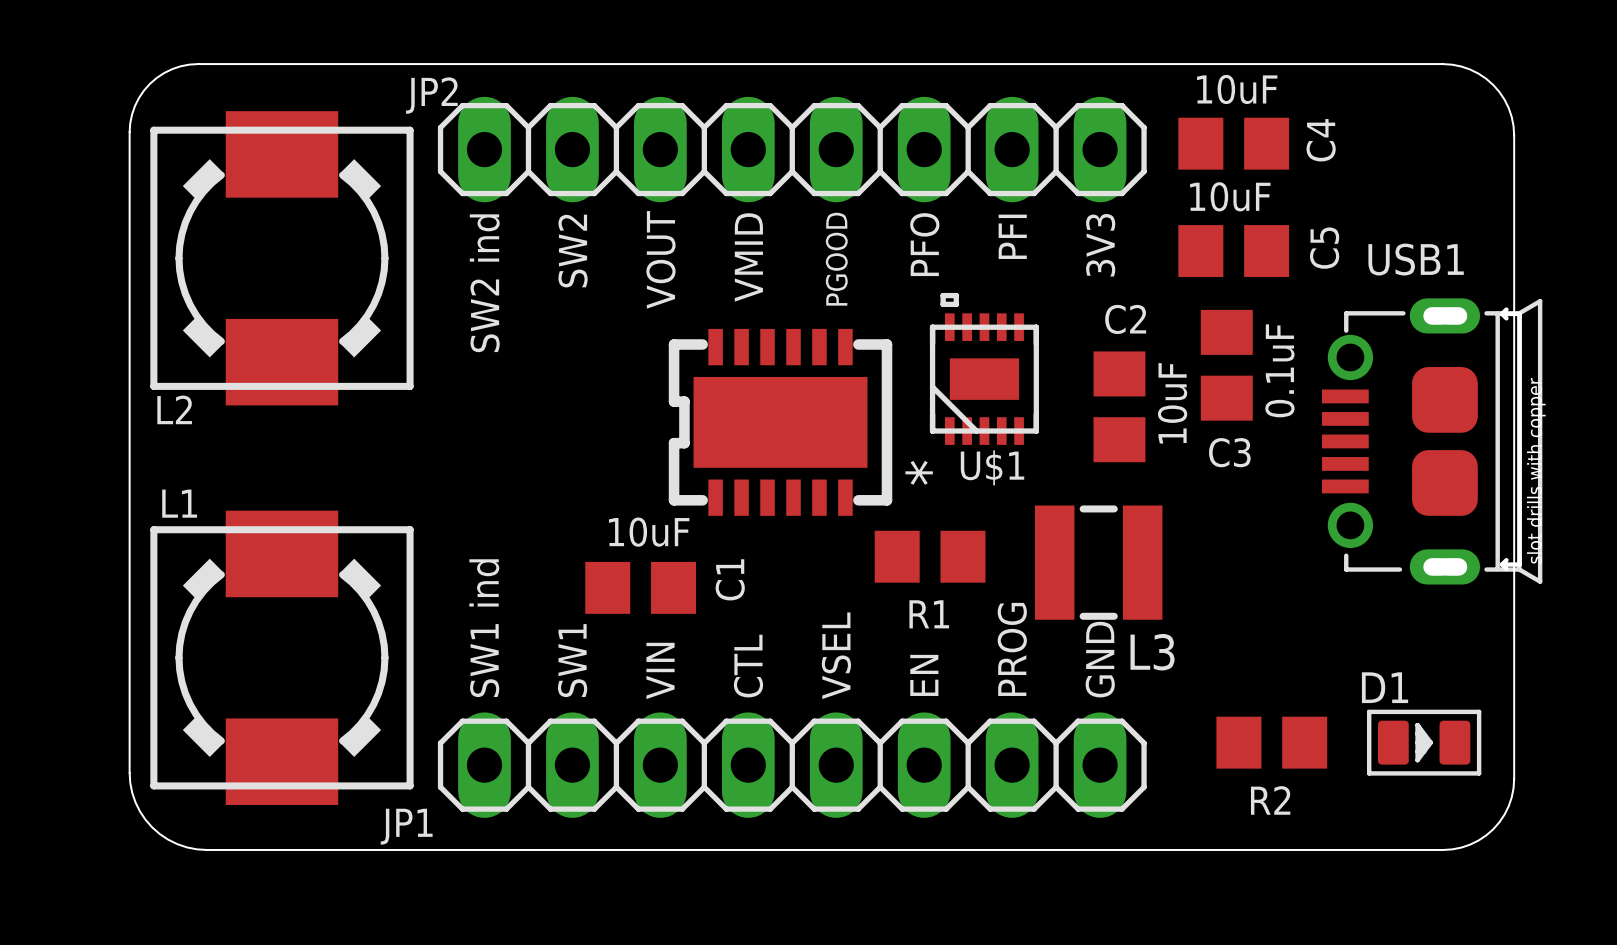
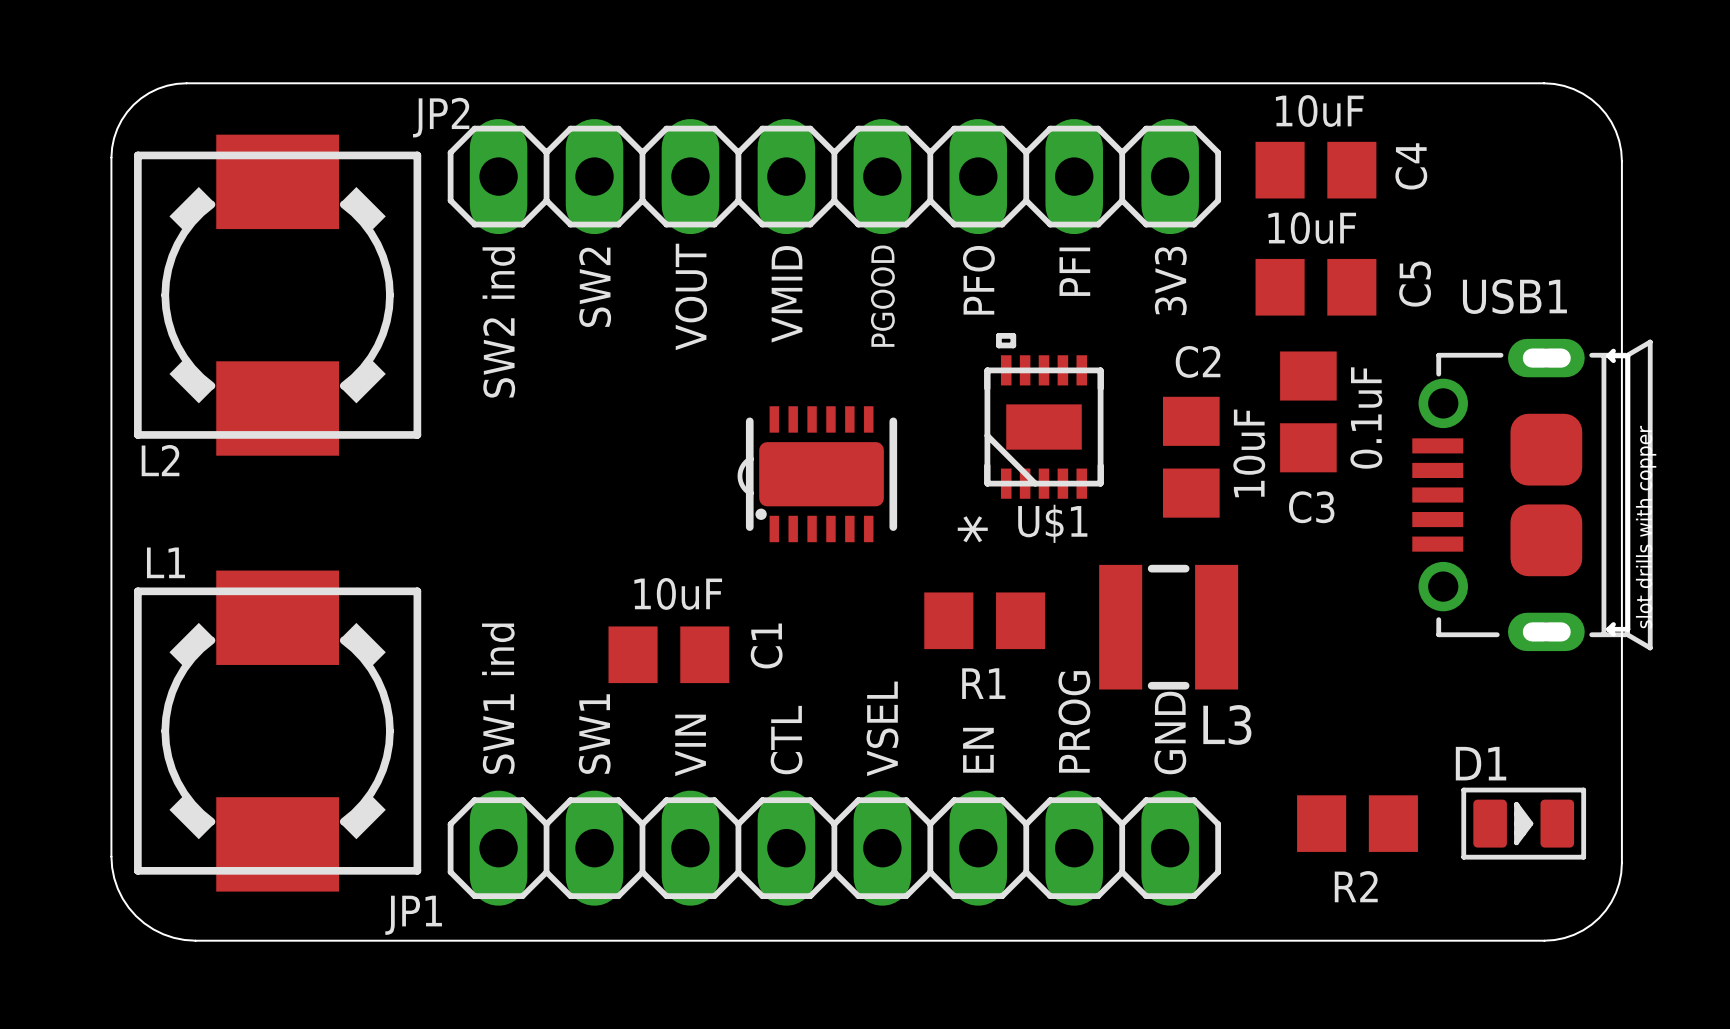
part footprint: [668, 328, 893, 516] -> [737, 406, 898, 543]

